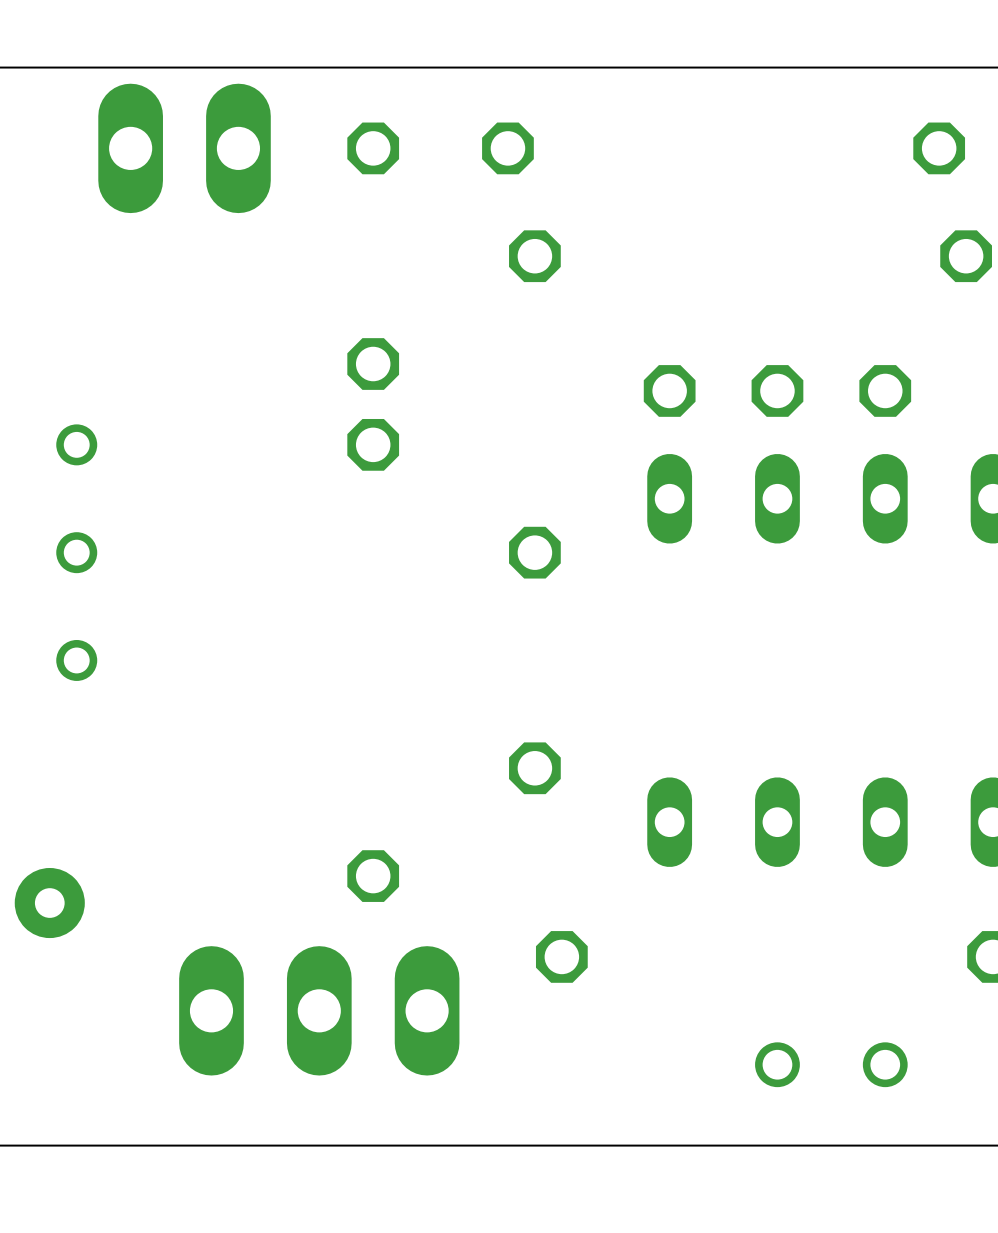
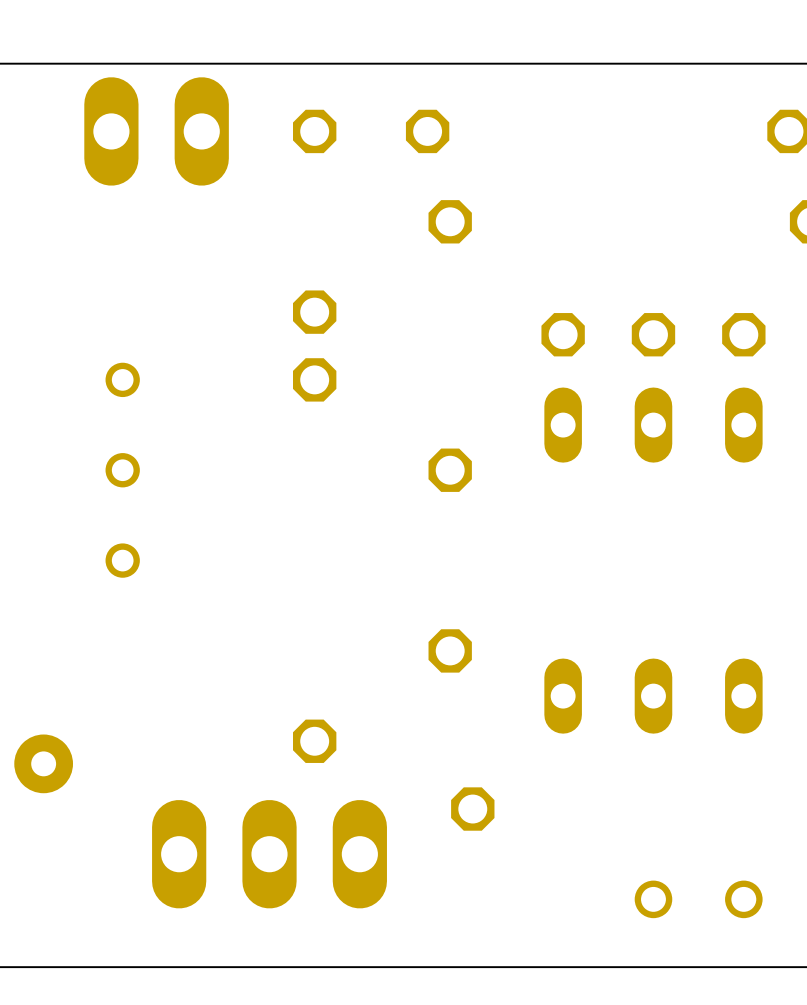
part position: (76, 552) -> (122, 470)

